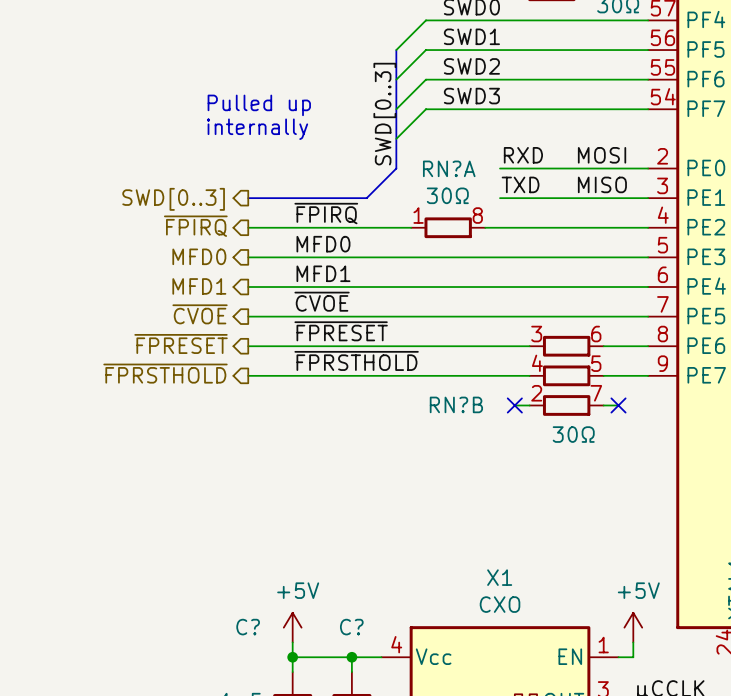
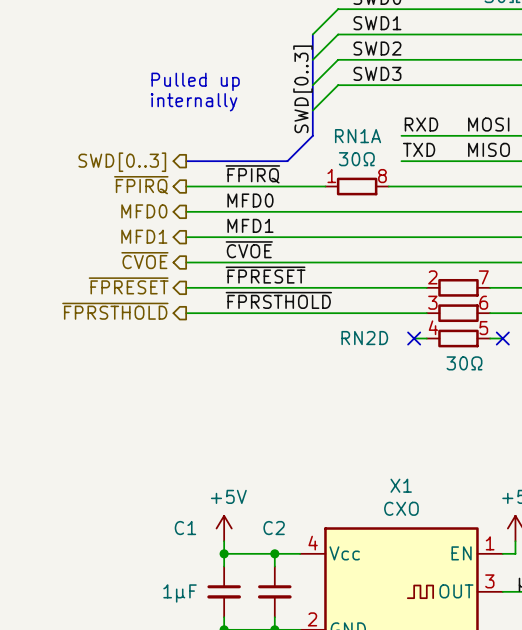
RN?A name: RN?A (449, 168) -> RN1A (358, 136)
part pin number: 3 (536, 334) -> 2 (432, 277)
part pin number: 6 (596, 334) -> 7 (483, 277)
part pin number: 4 (537, 363) -> 3 (432, 302)
part pin number: 5 (596, 363) -> 6 (483, 302)
RN?B pin number: 2 (536, 393) -> 4 (433, 327)
RN?B pin number: 7 (596, 393) -> 5 (483, 328)
RN?B name: RN?B (456, 404) -> RN2D (364, 338)
C? name: C? (248, 627) -> C1 (185, 528)
C? name: C? (351, 627) -> C2 (274, 528)

